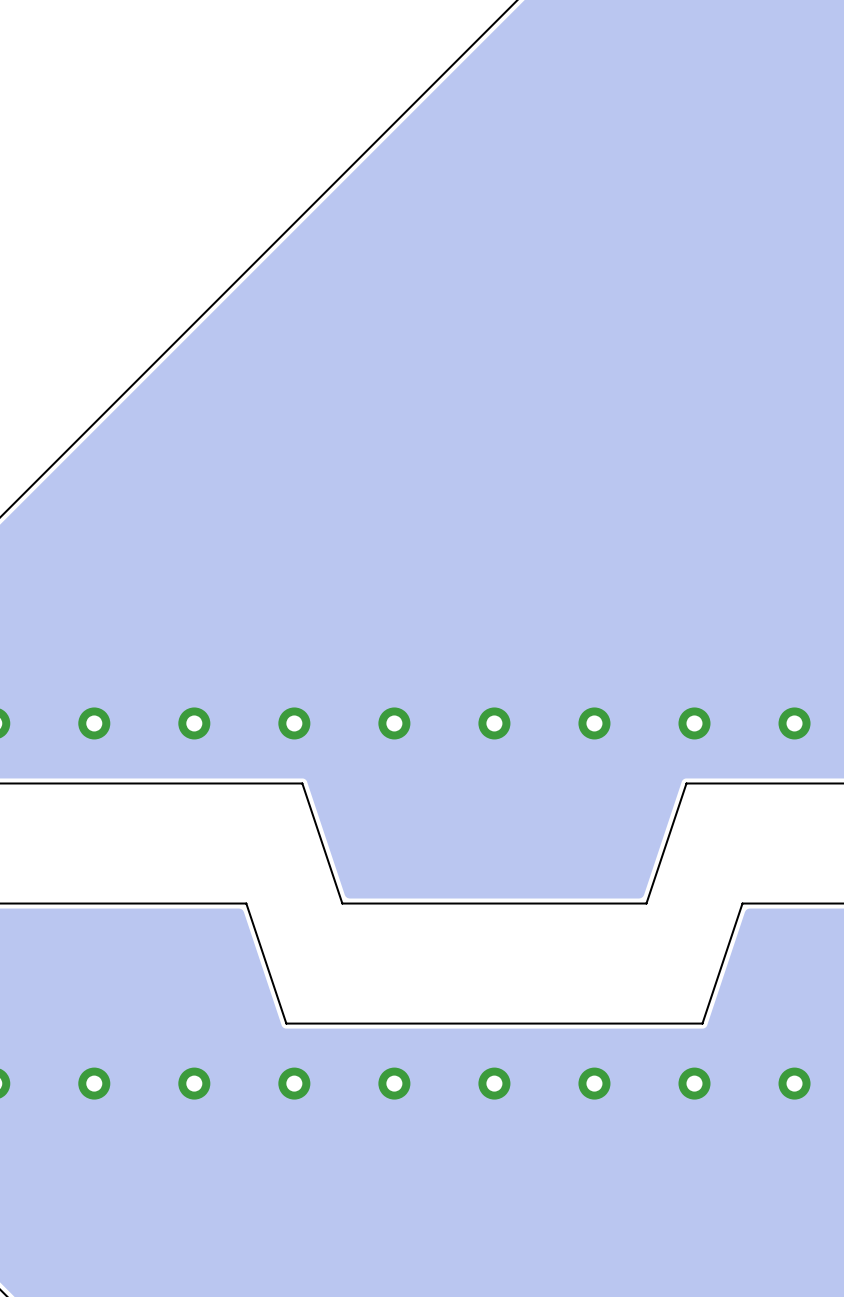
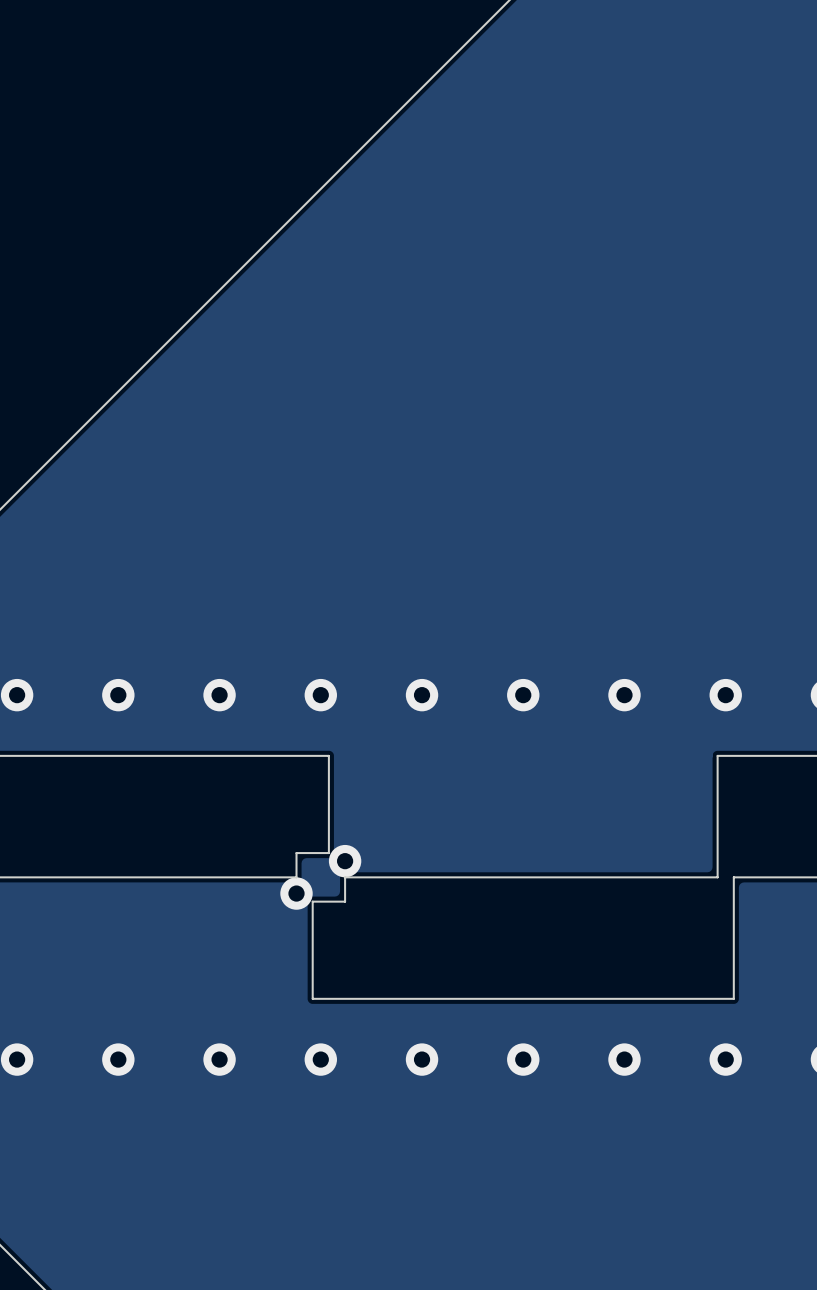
board edge: (302, 783) (342, 903) -> (328, 755) (328, 853) (296, 853) (296, 877) (272, 877)
board edge: (686, 783) (646, 903) -> (717, 755) (717, 877) (677, 877)
via: none -> (345, 861)
board edge: (246, 903) (286, 1023) -> (369, 877) (345, 877) (345, 901) (312, 901) (312, 998)
board edge: (742, 903) (702, 1023) -> (774, 877) (733, 877) (733, 998)
via: none -> (296, 893)

